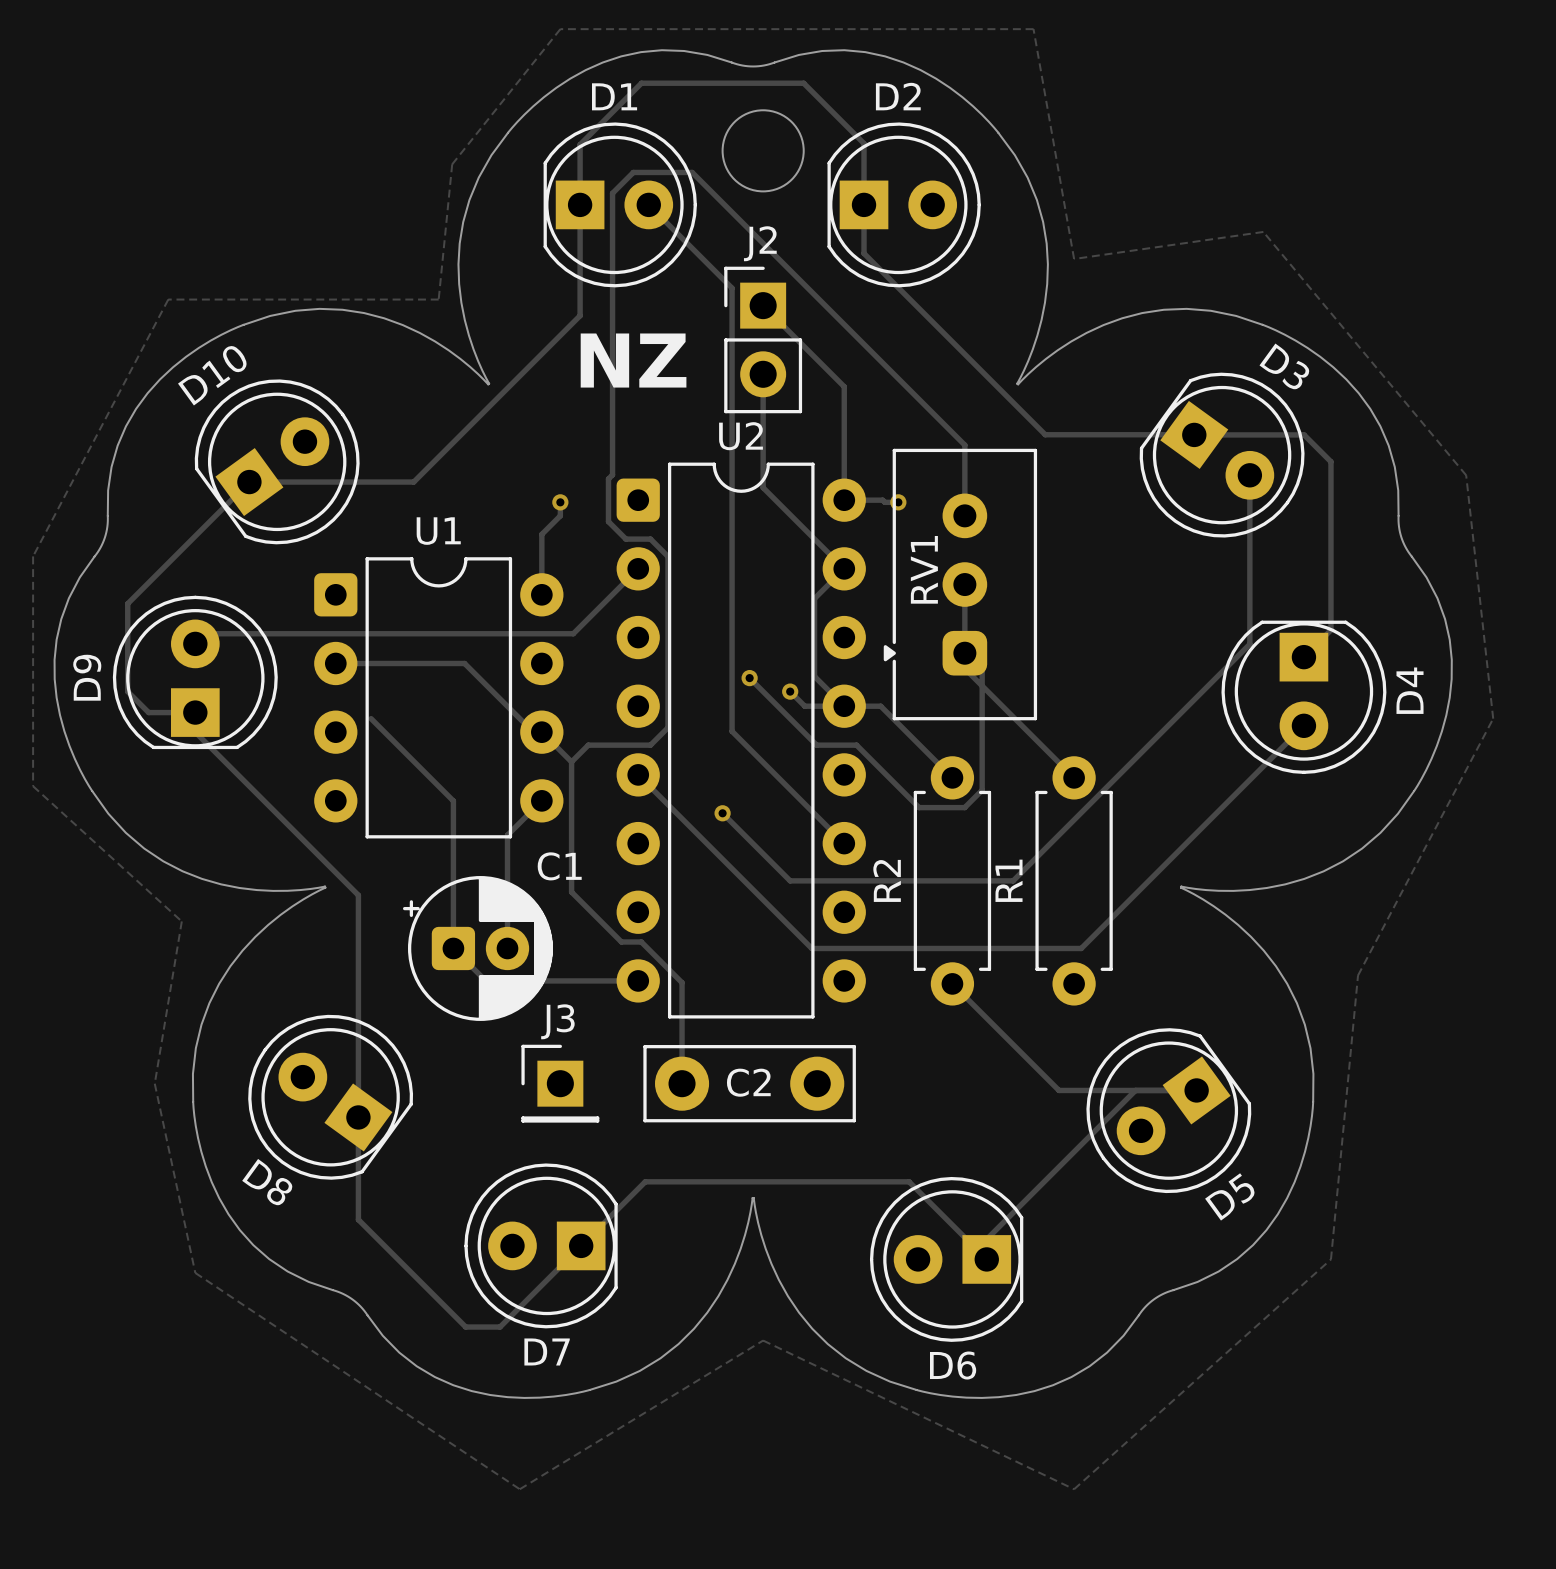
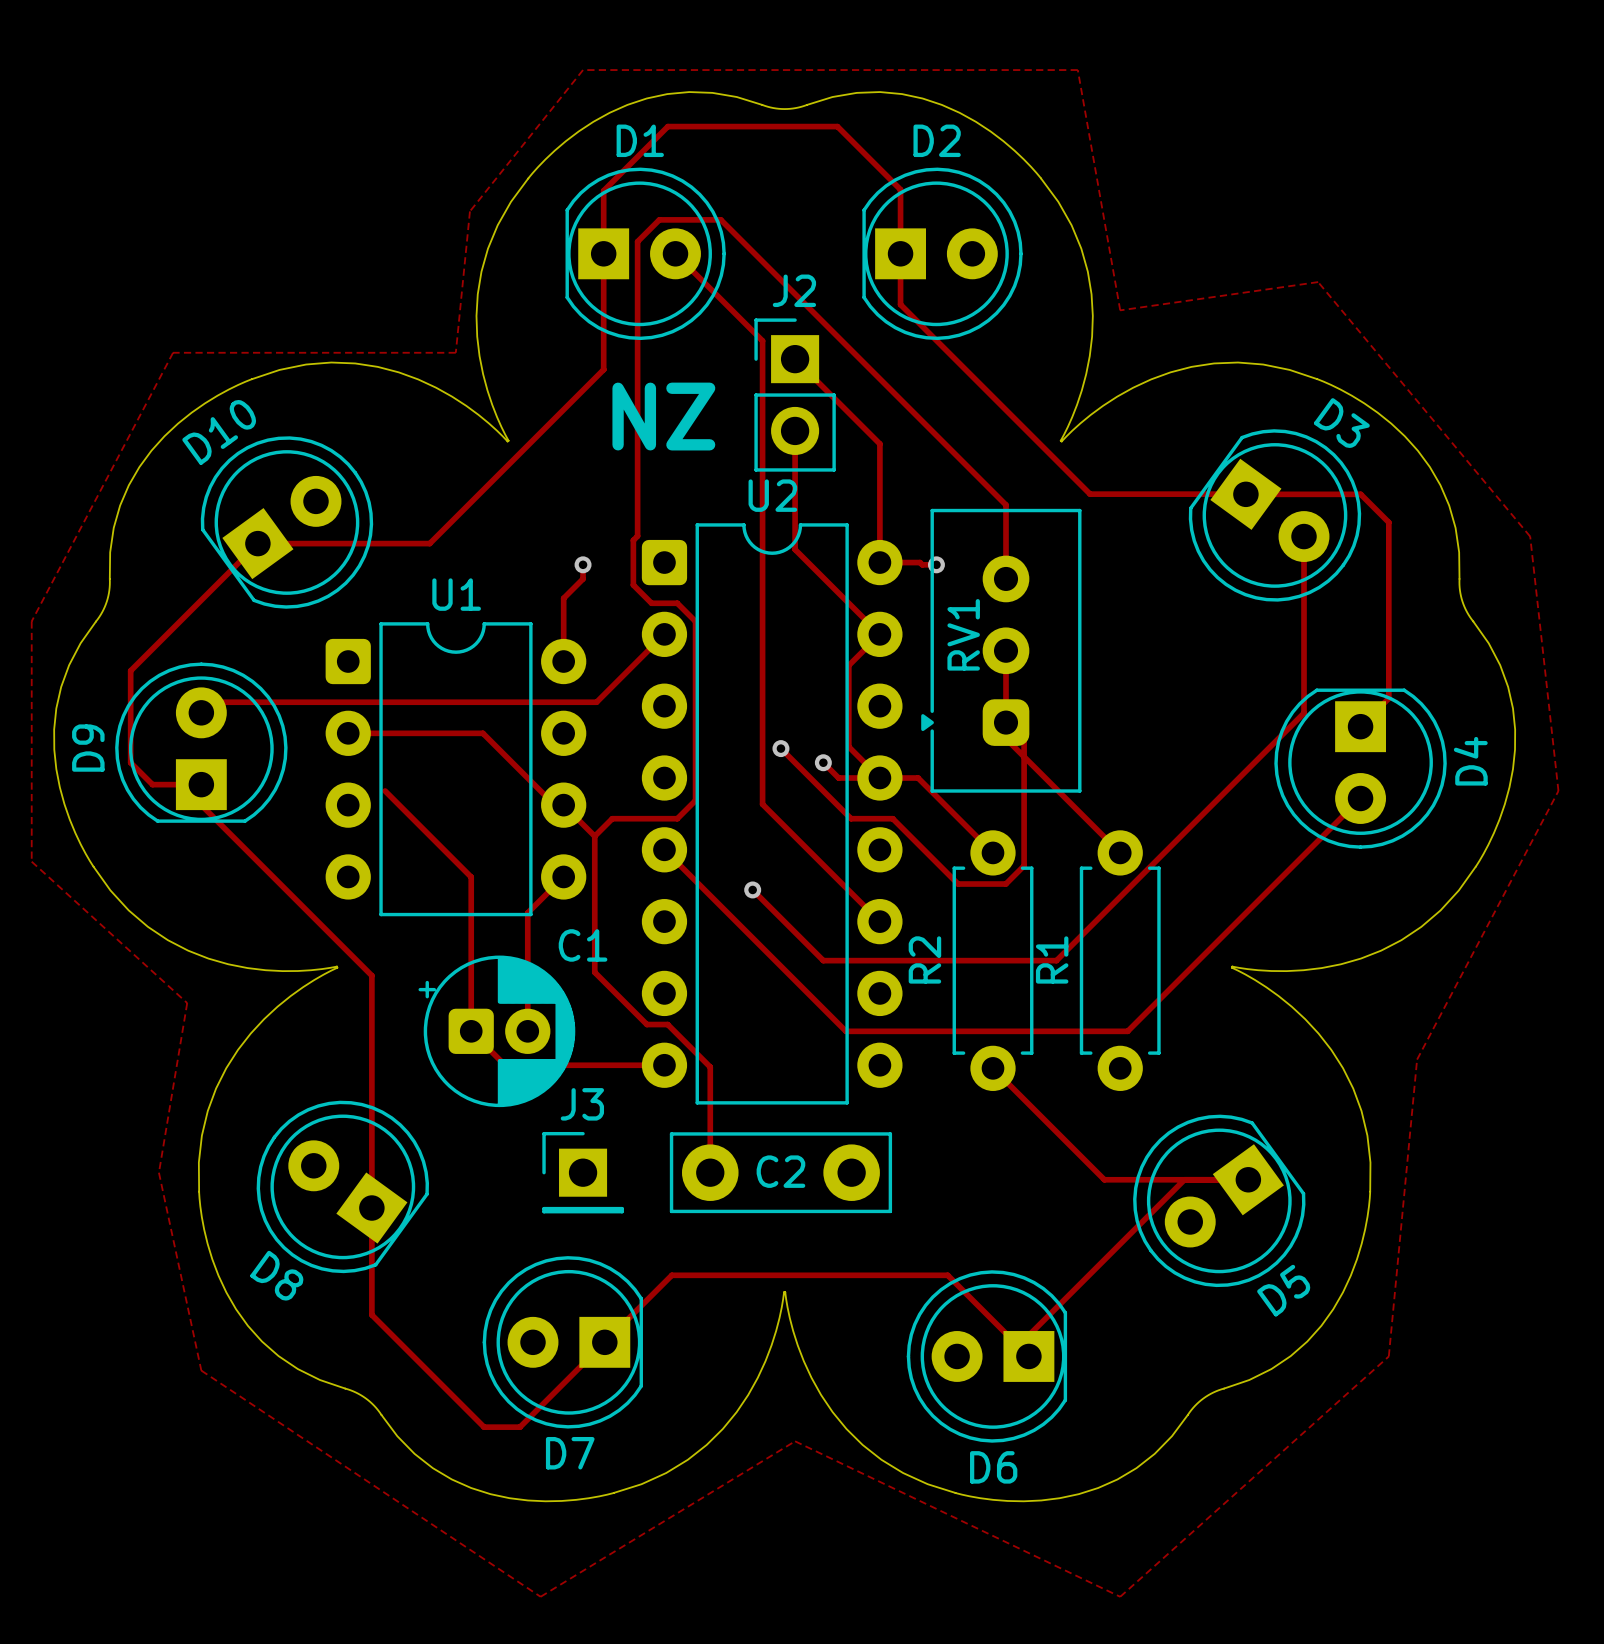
round board edge: [721, 109, 805, 193] -> none

